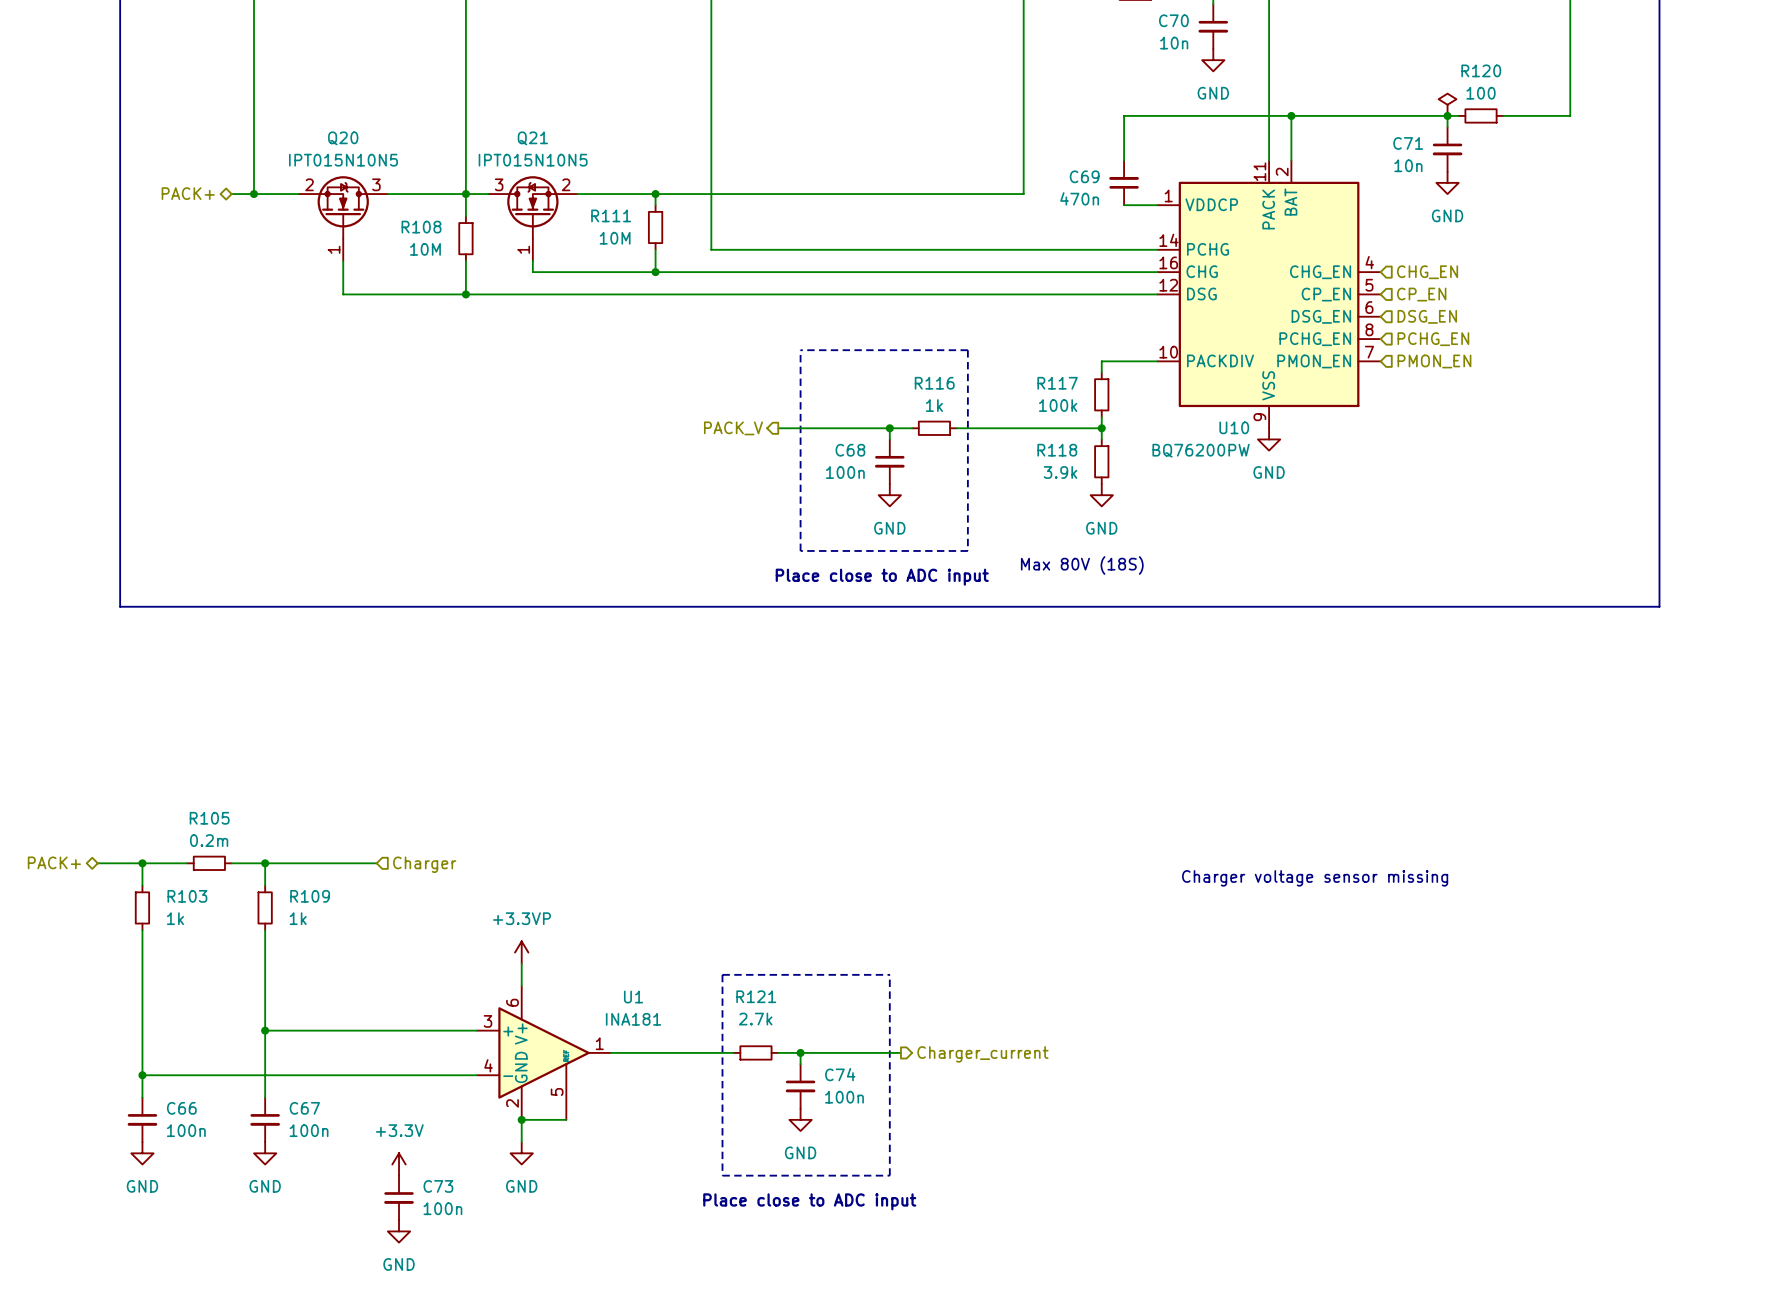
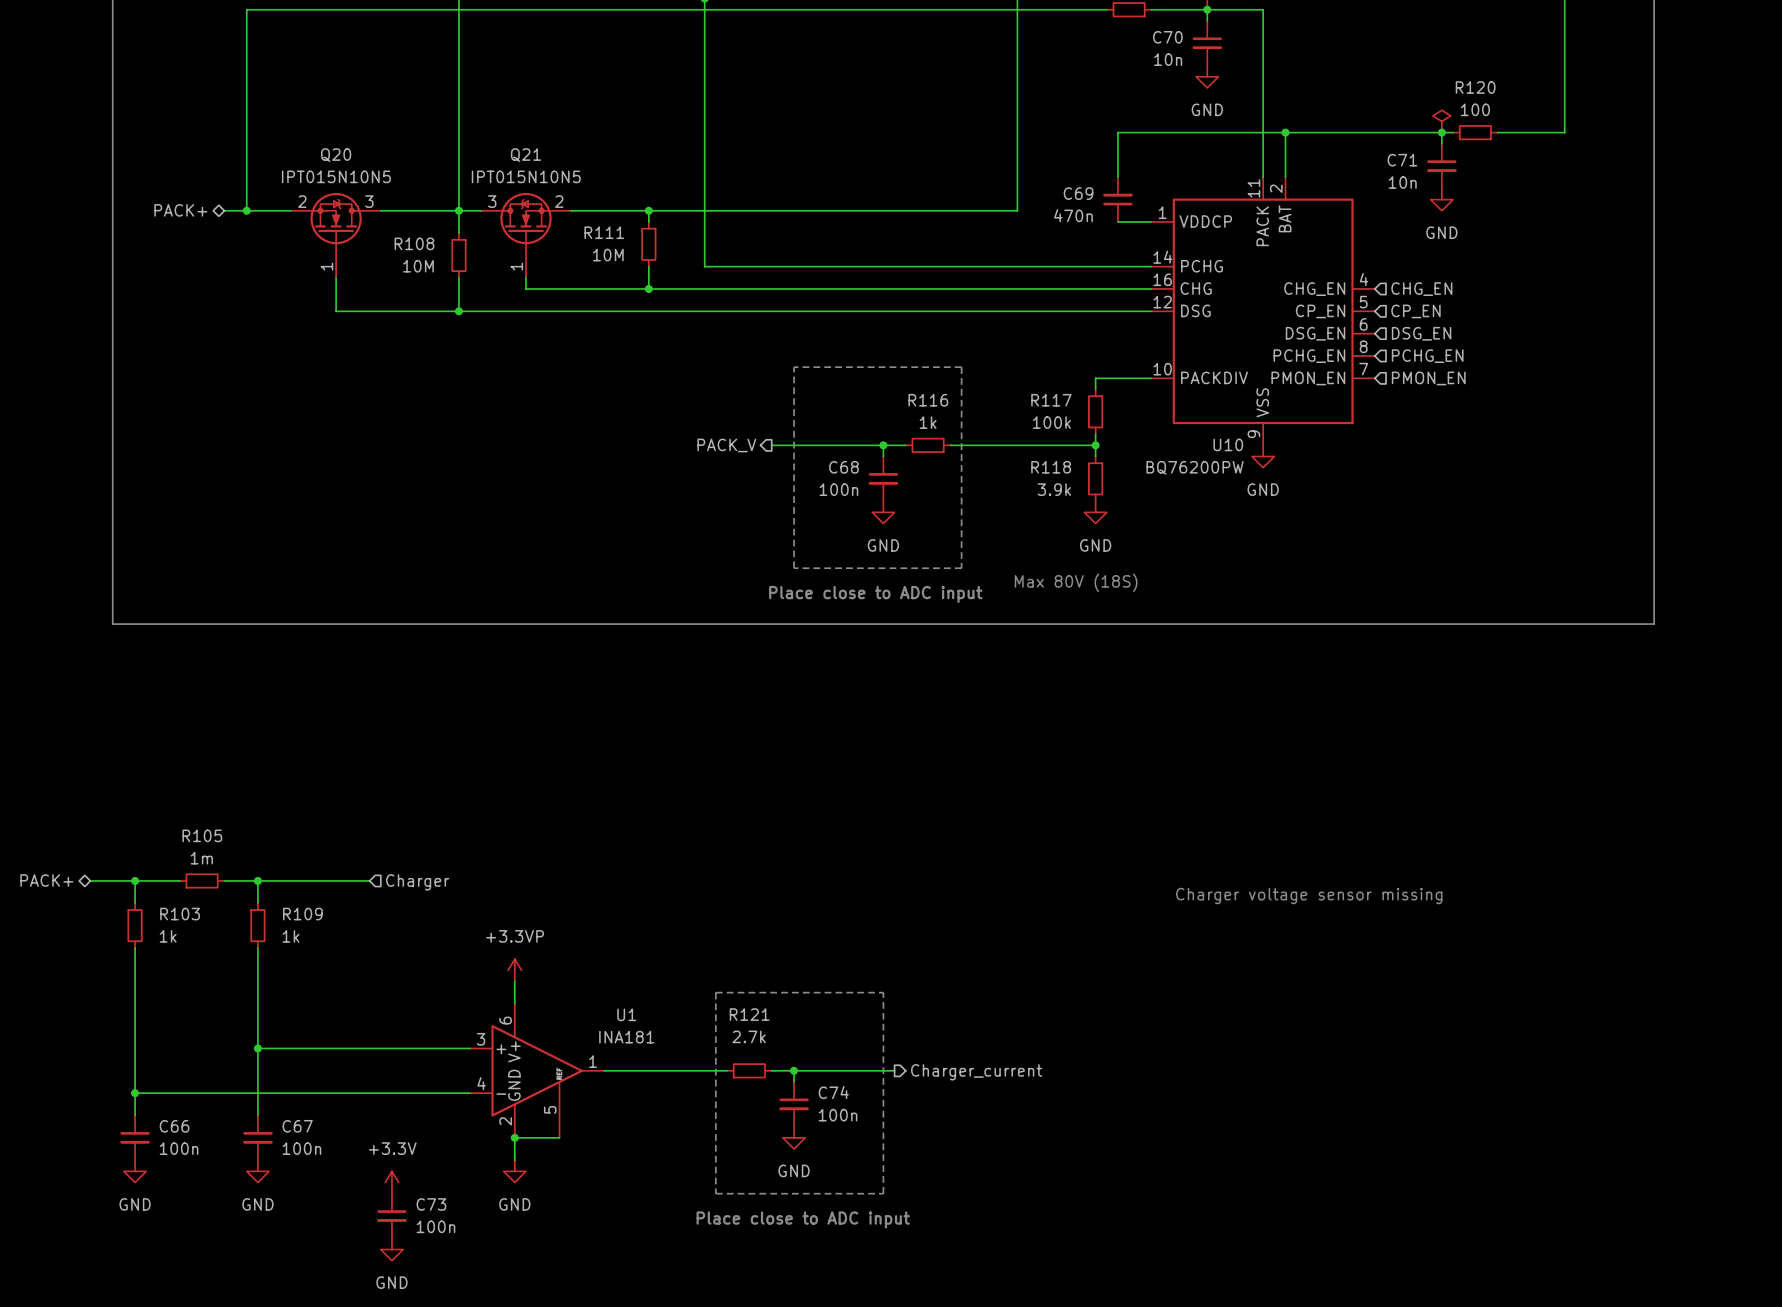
R105 value: 0.2m (209, 840) -> 1m (201, 858)

